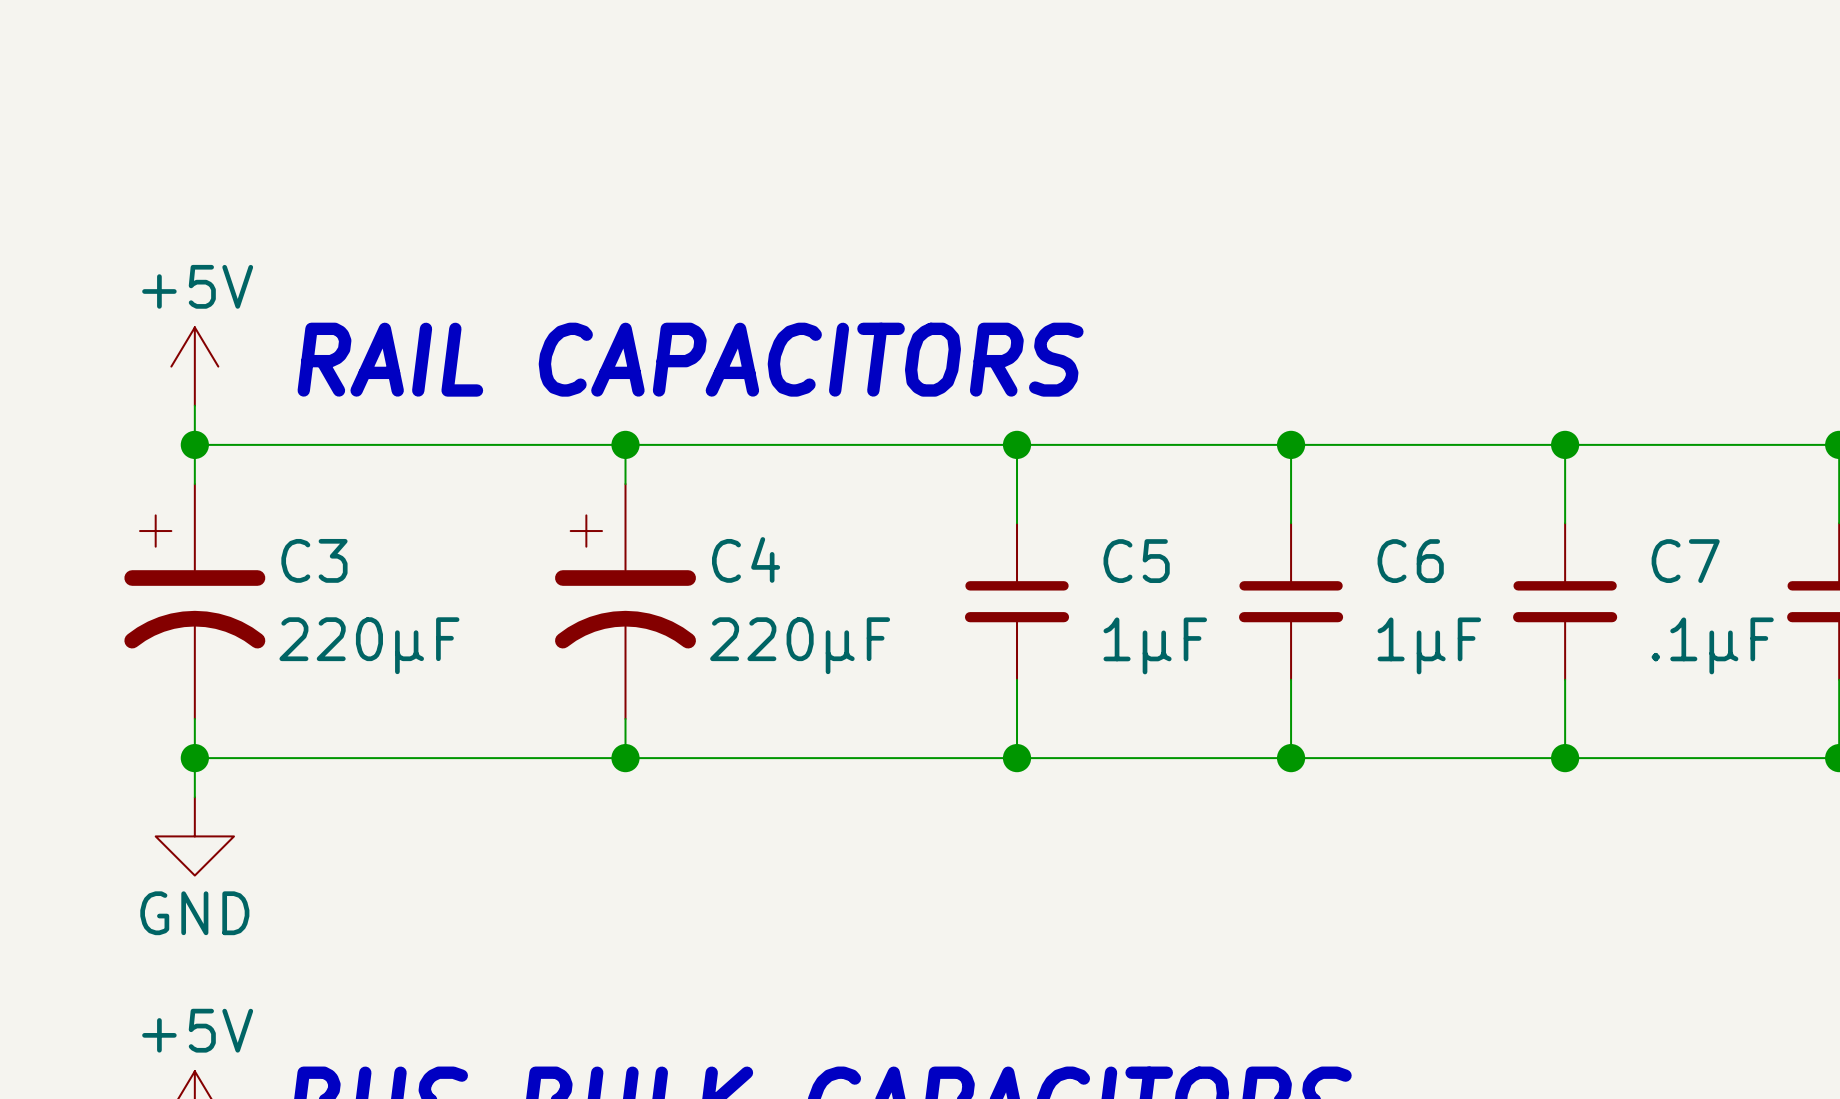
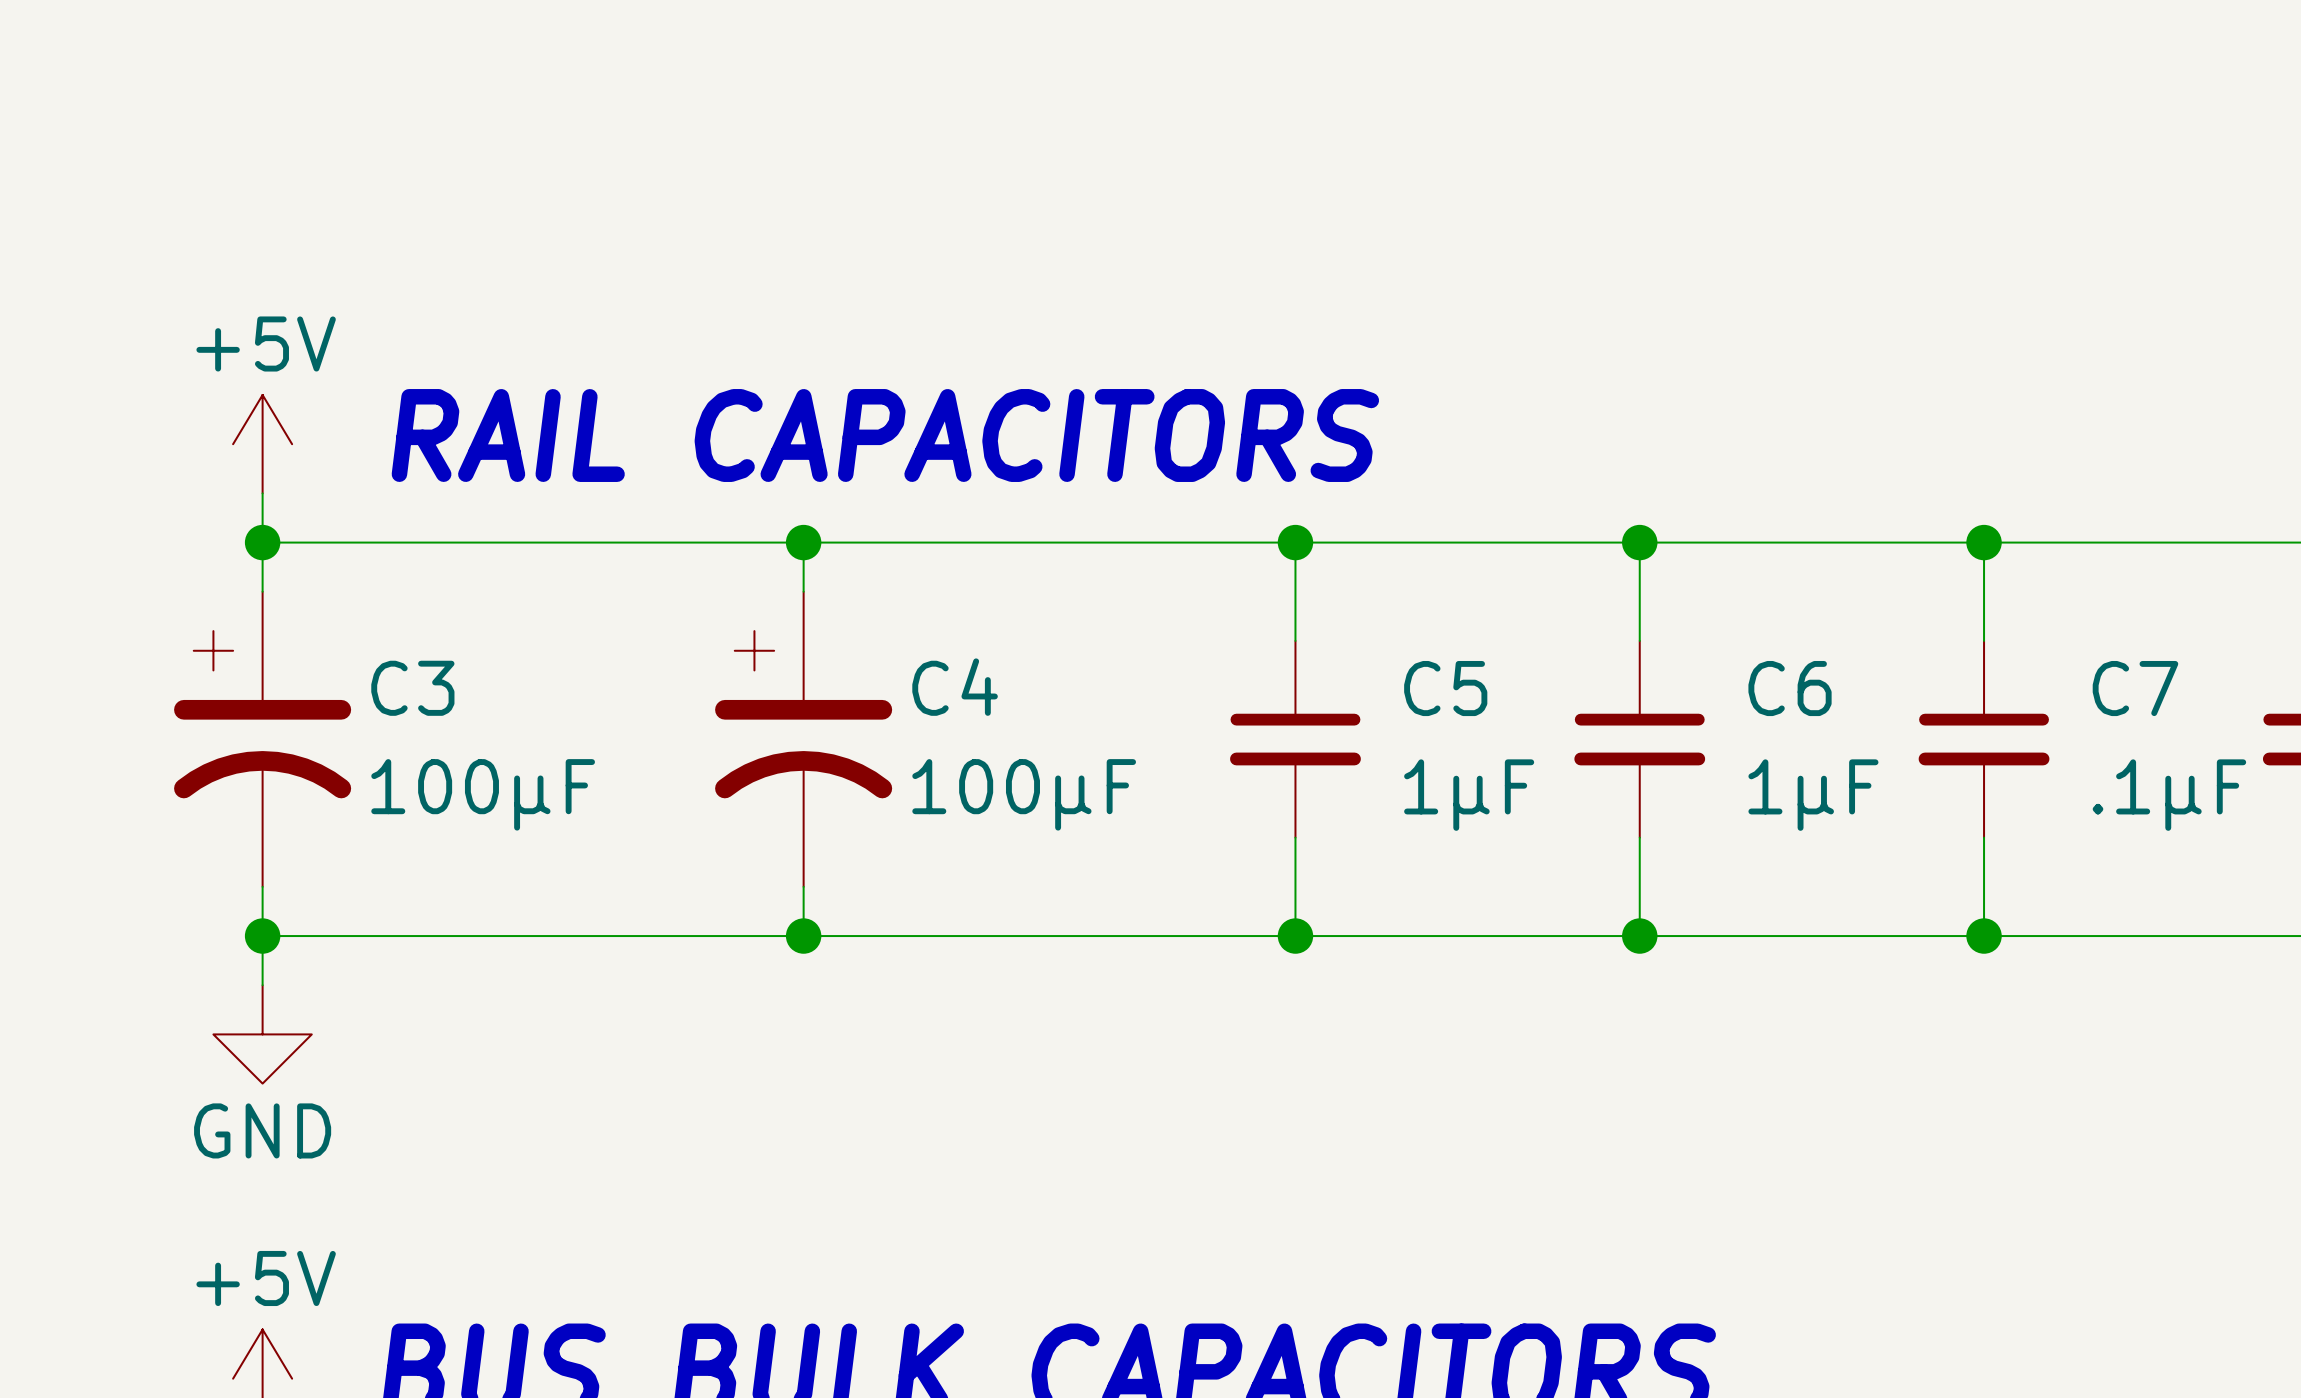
C3 value: 220µF (369, 645) -> 100µF (483, 794)
C4 value: 220µF (800, 645) -> 100µF (1024, 794)

